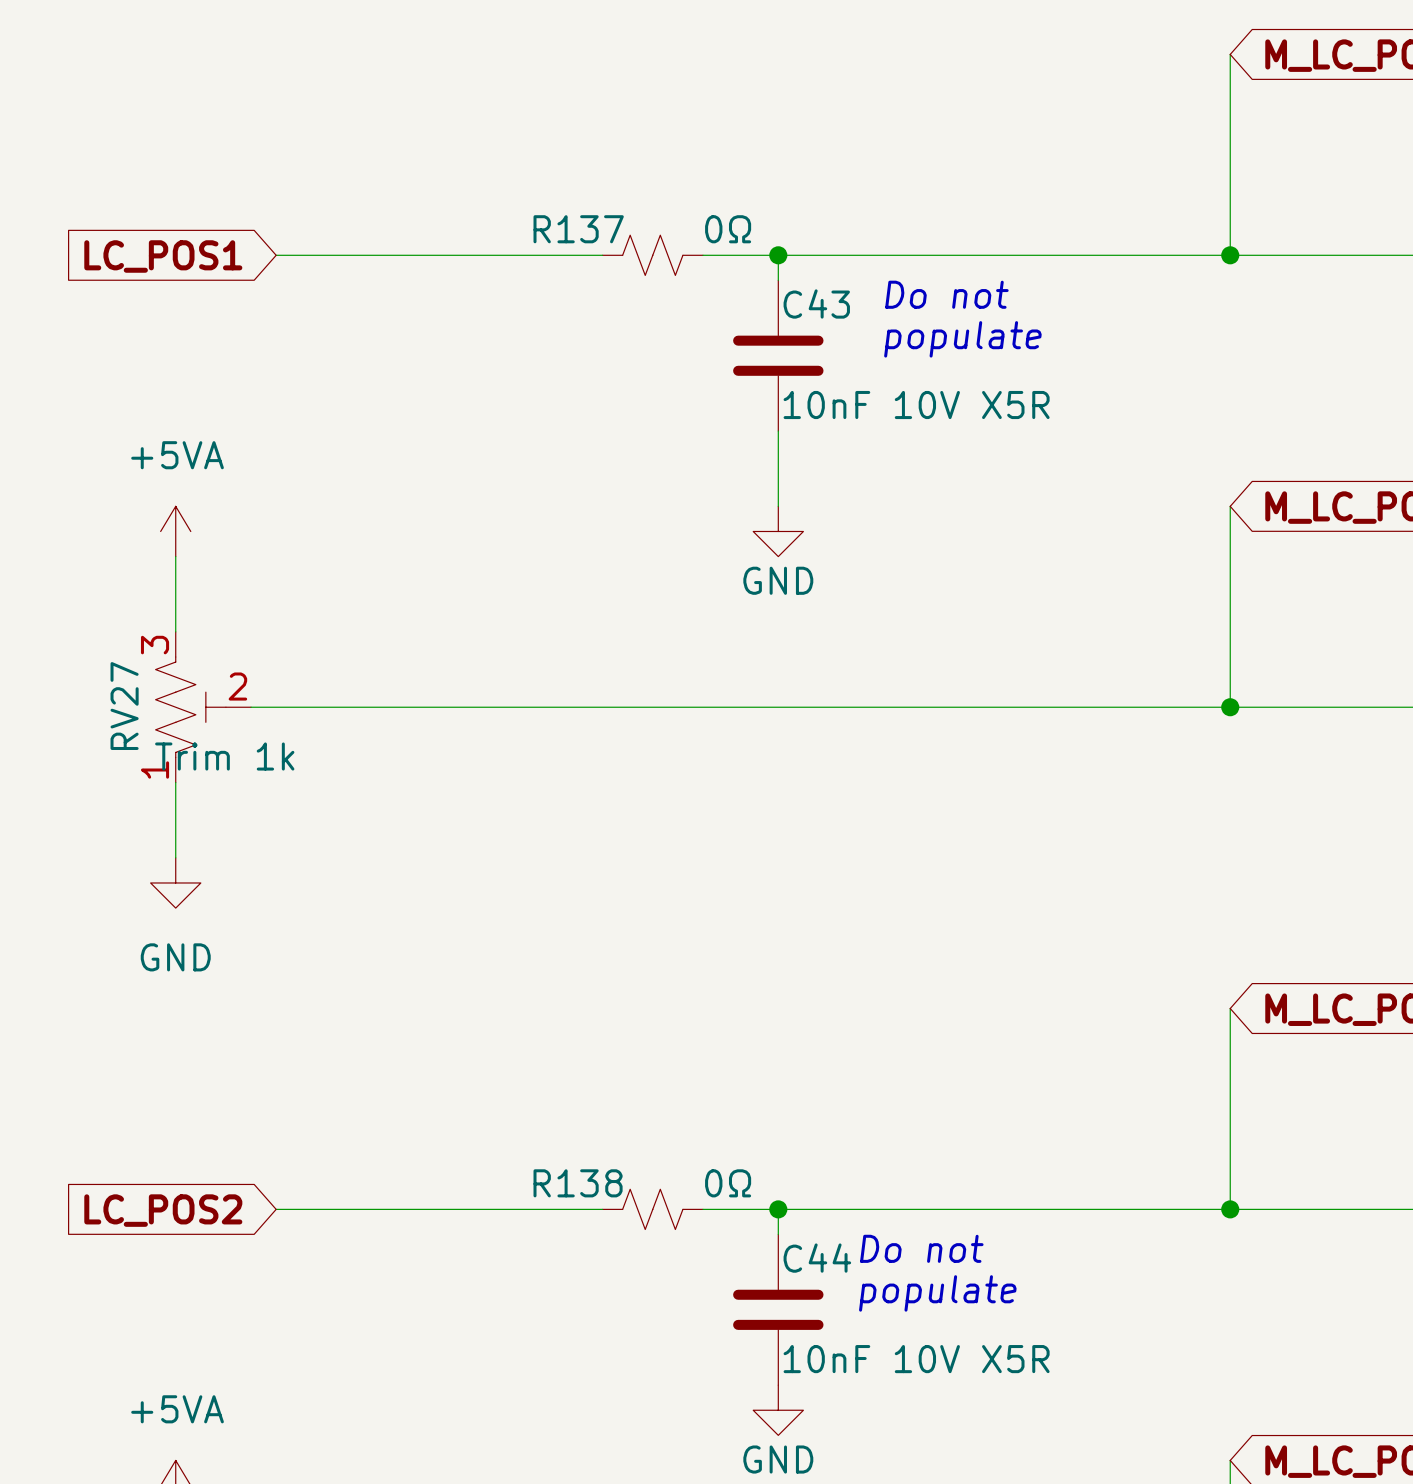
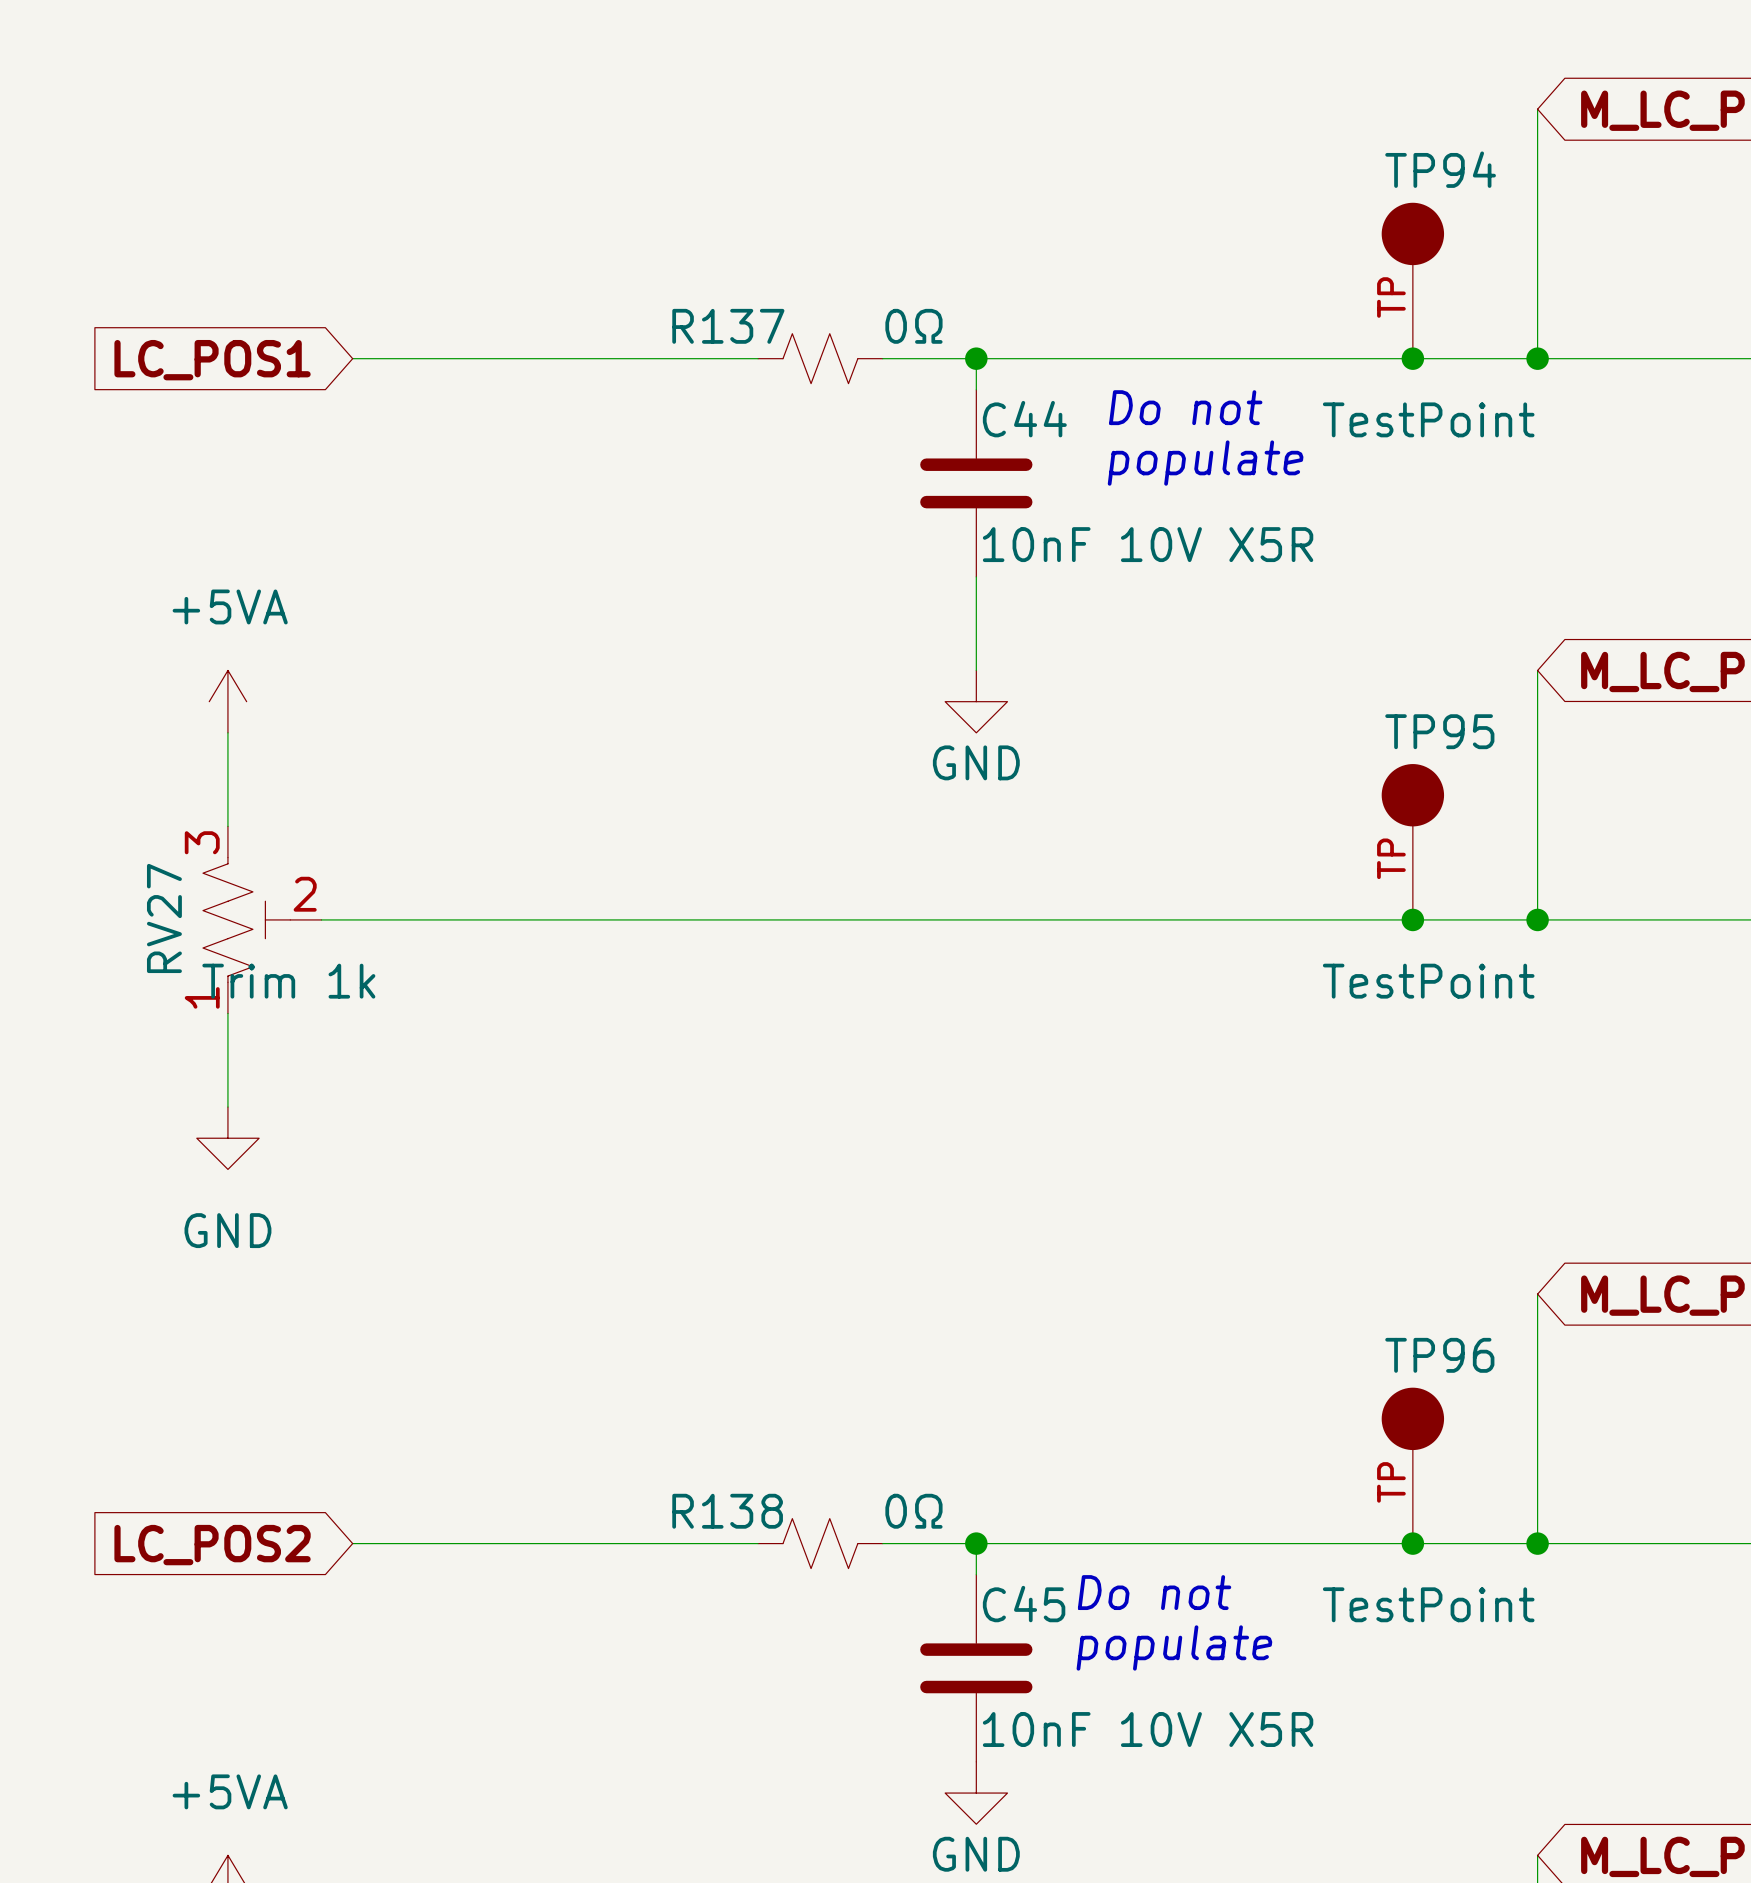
TP94: none -> TestPoint (1412, 280)
junction: none -> (1412, 358)
C43 name: C43 (816, 303) -> C44 (1024, 419)
TP95: none -> TestPoint (1412, 842)
junction: none -> (1412, 919)
TP96: none -> TestPoint (1412, 1465)
junction: none -> (1412, 1543)
C44 name: C44 (817, 1258) -> C45 (1024, 1604)

